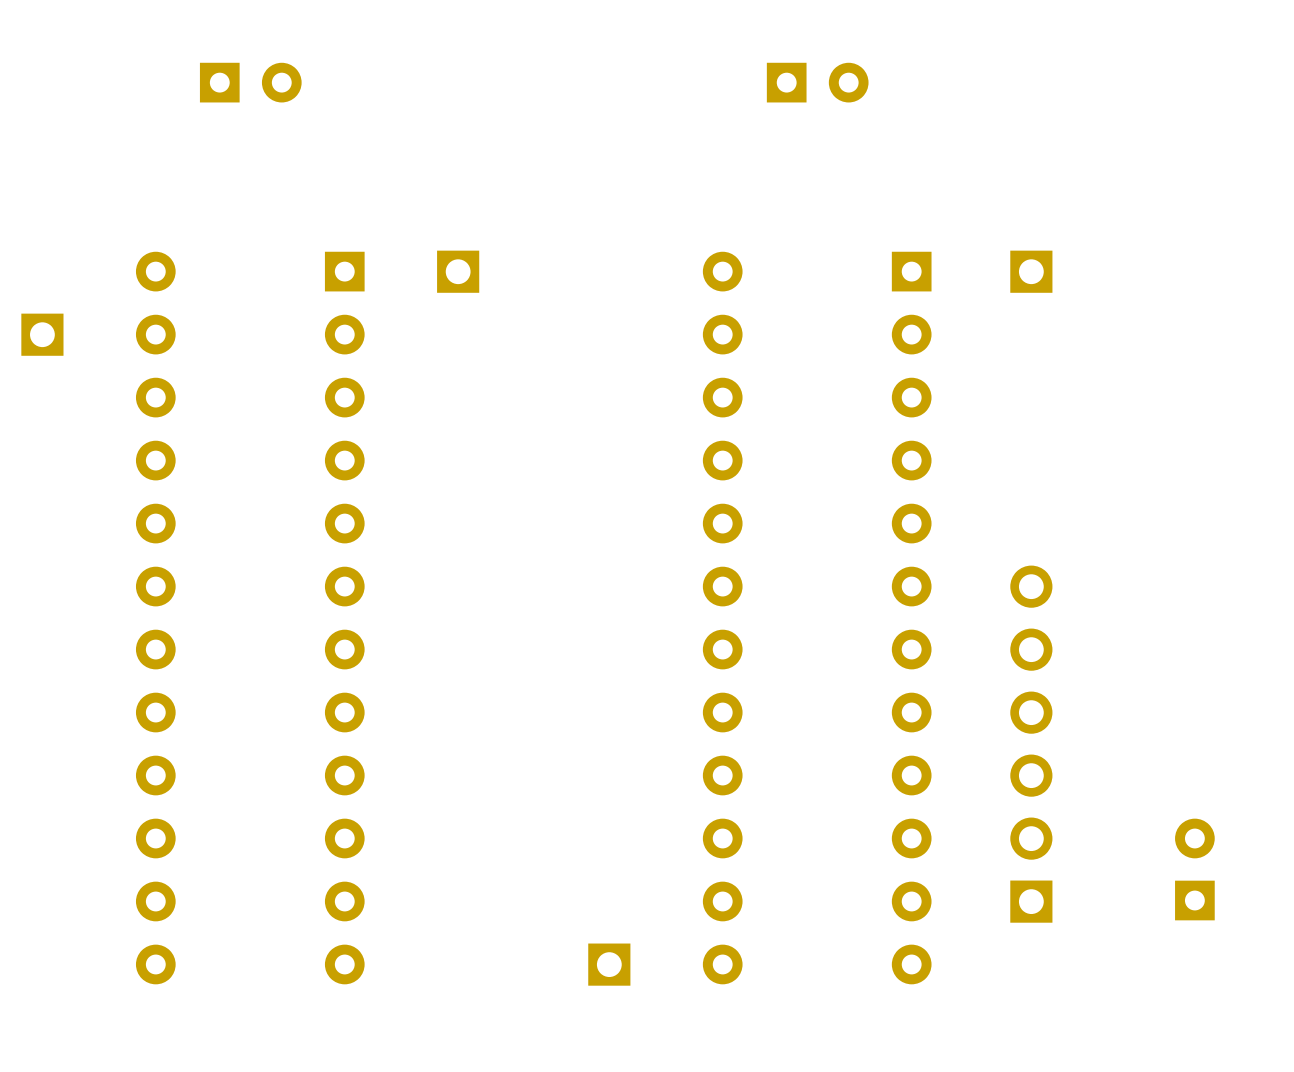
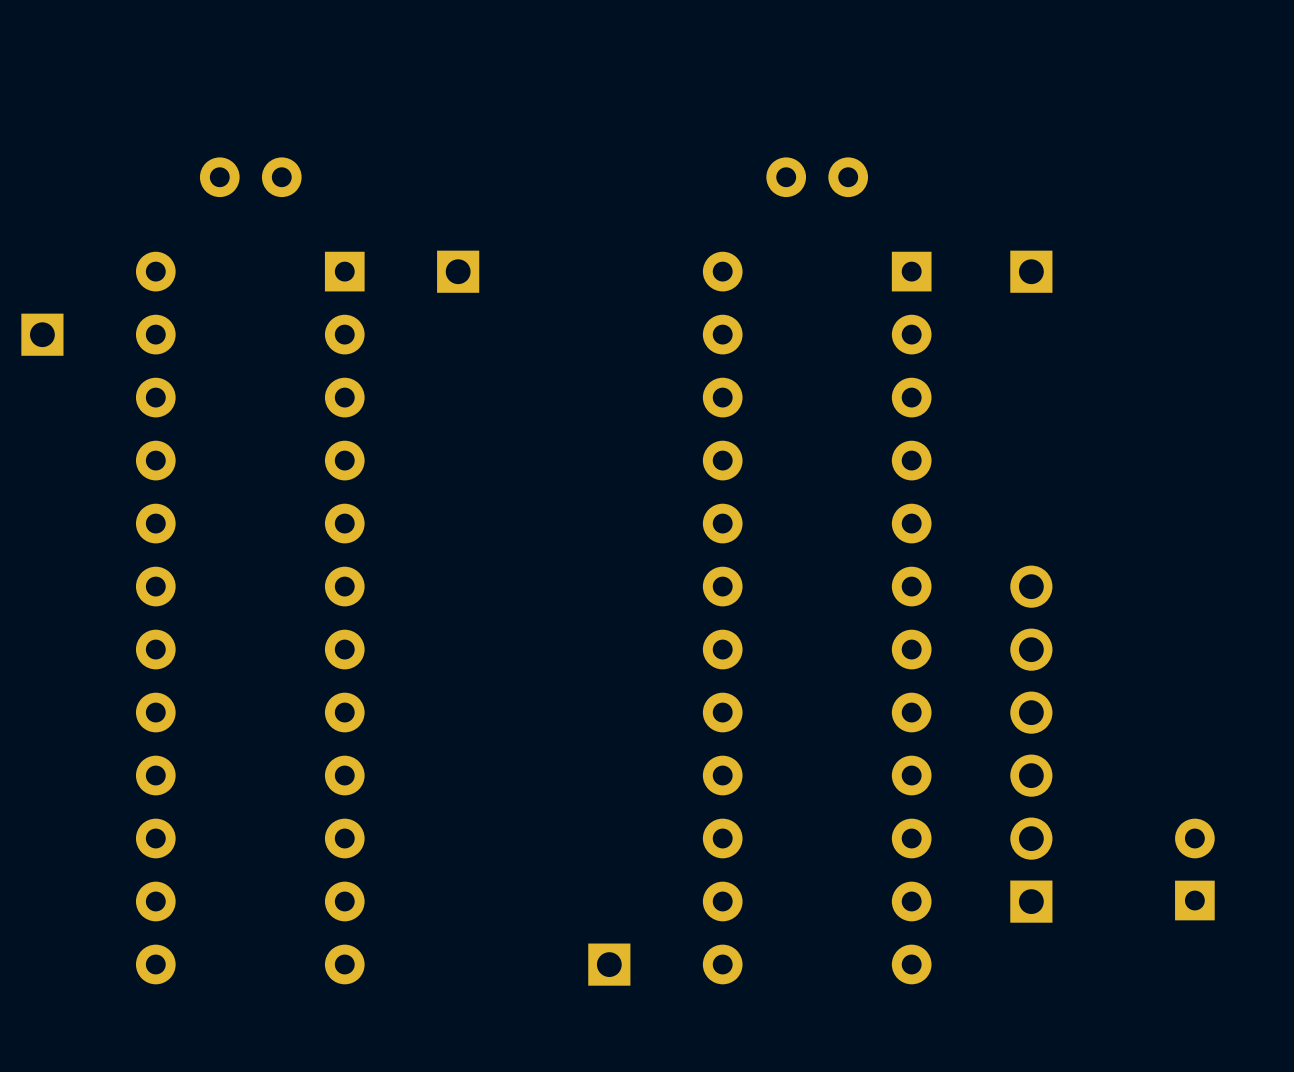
part: (250, 82) -> none
part: (817, 82) -> none
part: none -> (250, 177)
part: none -> (817, 177)

